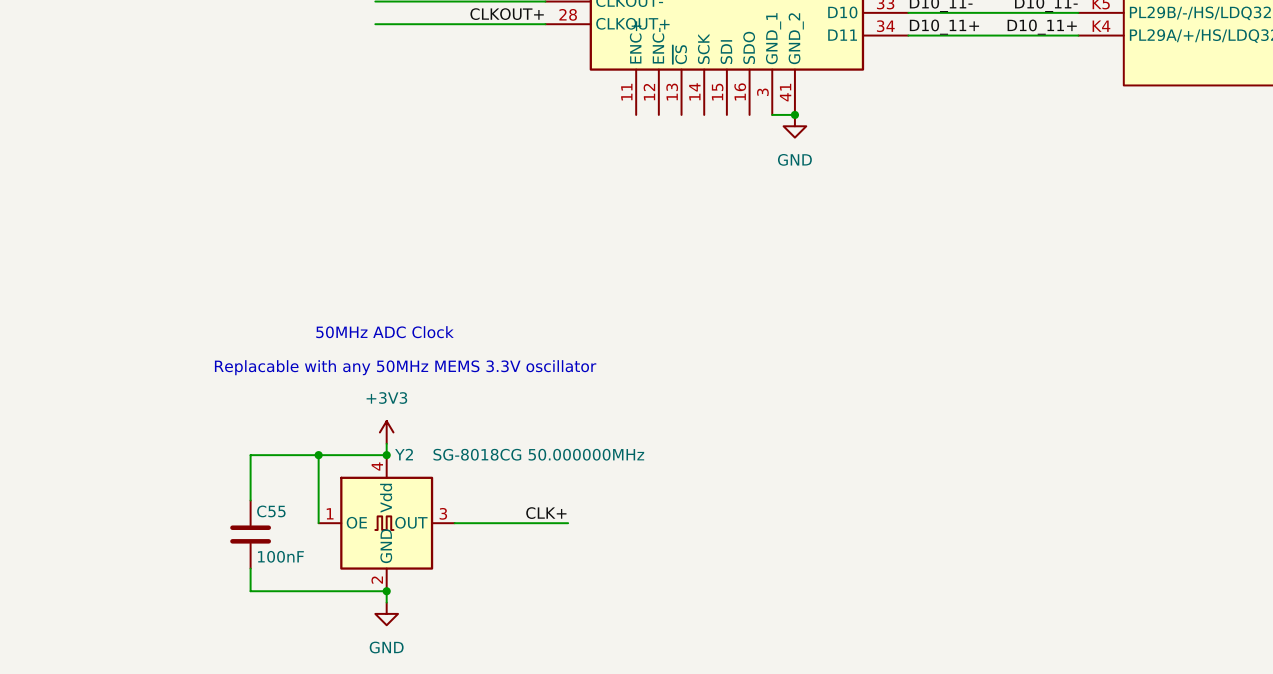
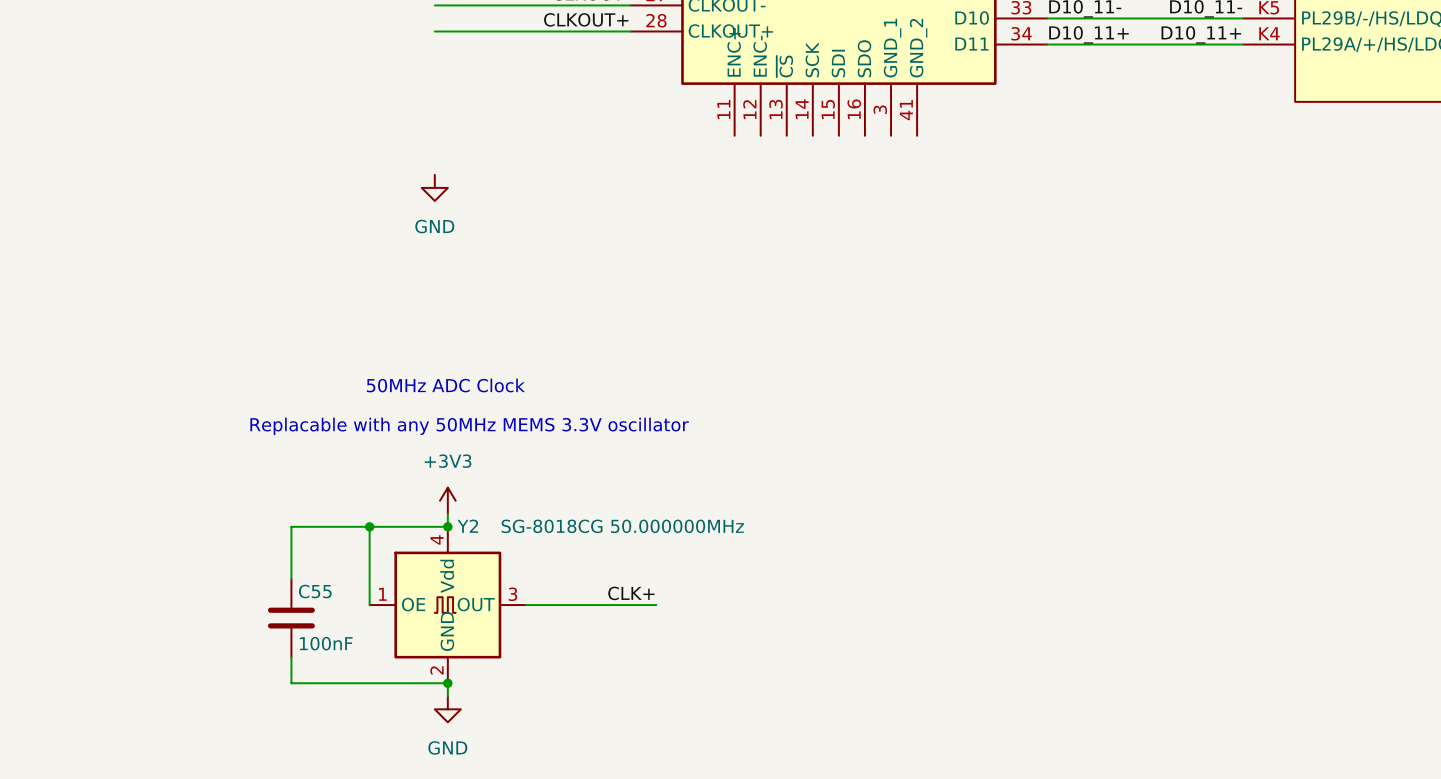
wire: (772, 114) (794, 114) -> none
junction: (794, 114) -> none
power symbol: GND (794, 126) -> none
power symbol: none -> GND (434, 187)

